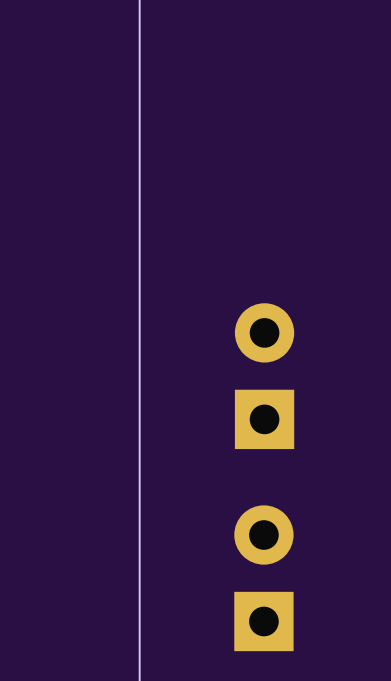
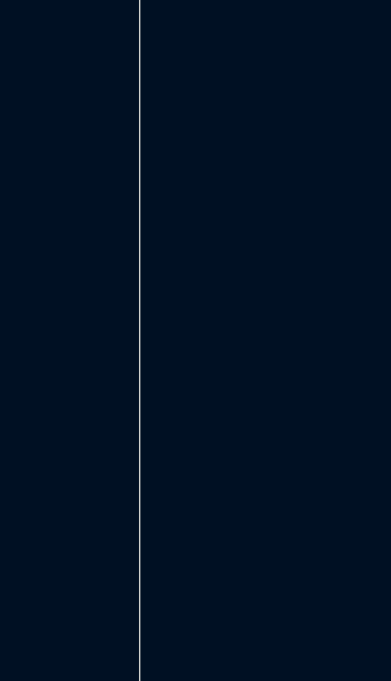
part: (264, 376) -> none
part: (263, 578) -> none

